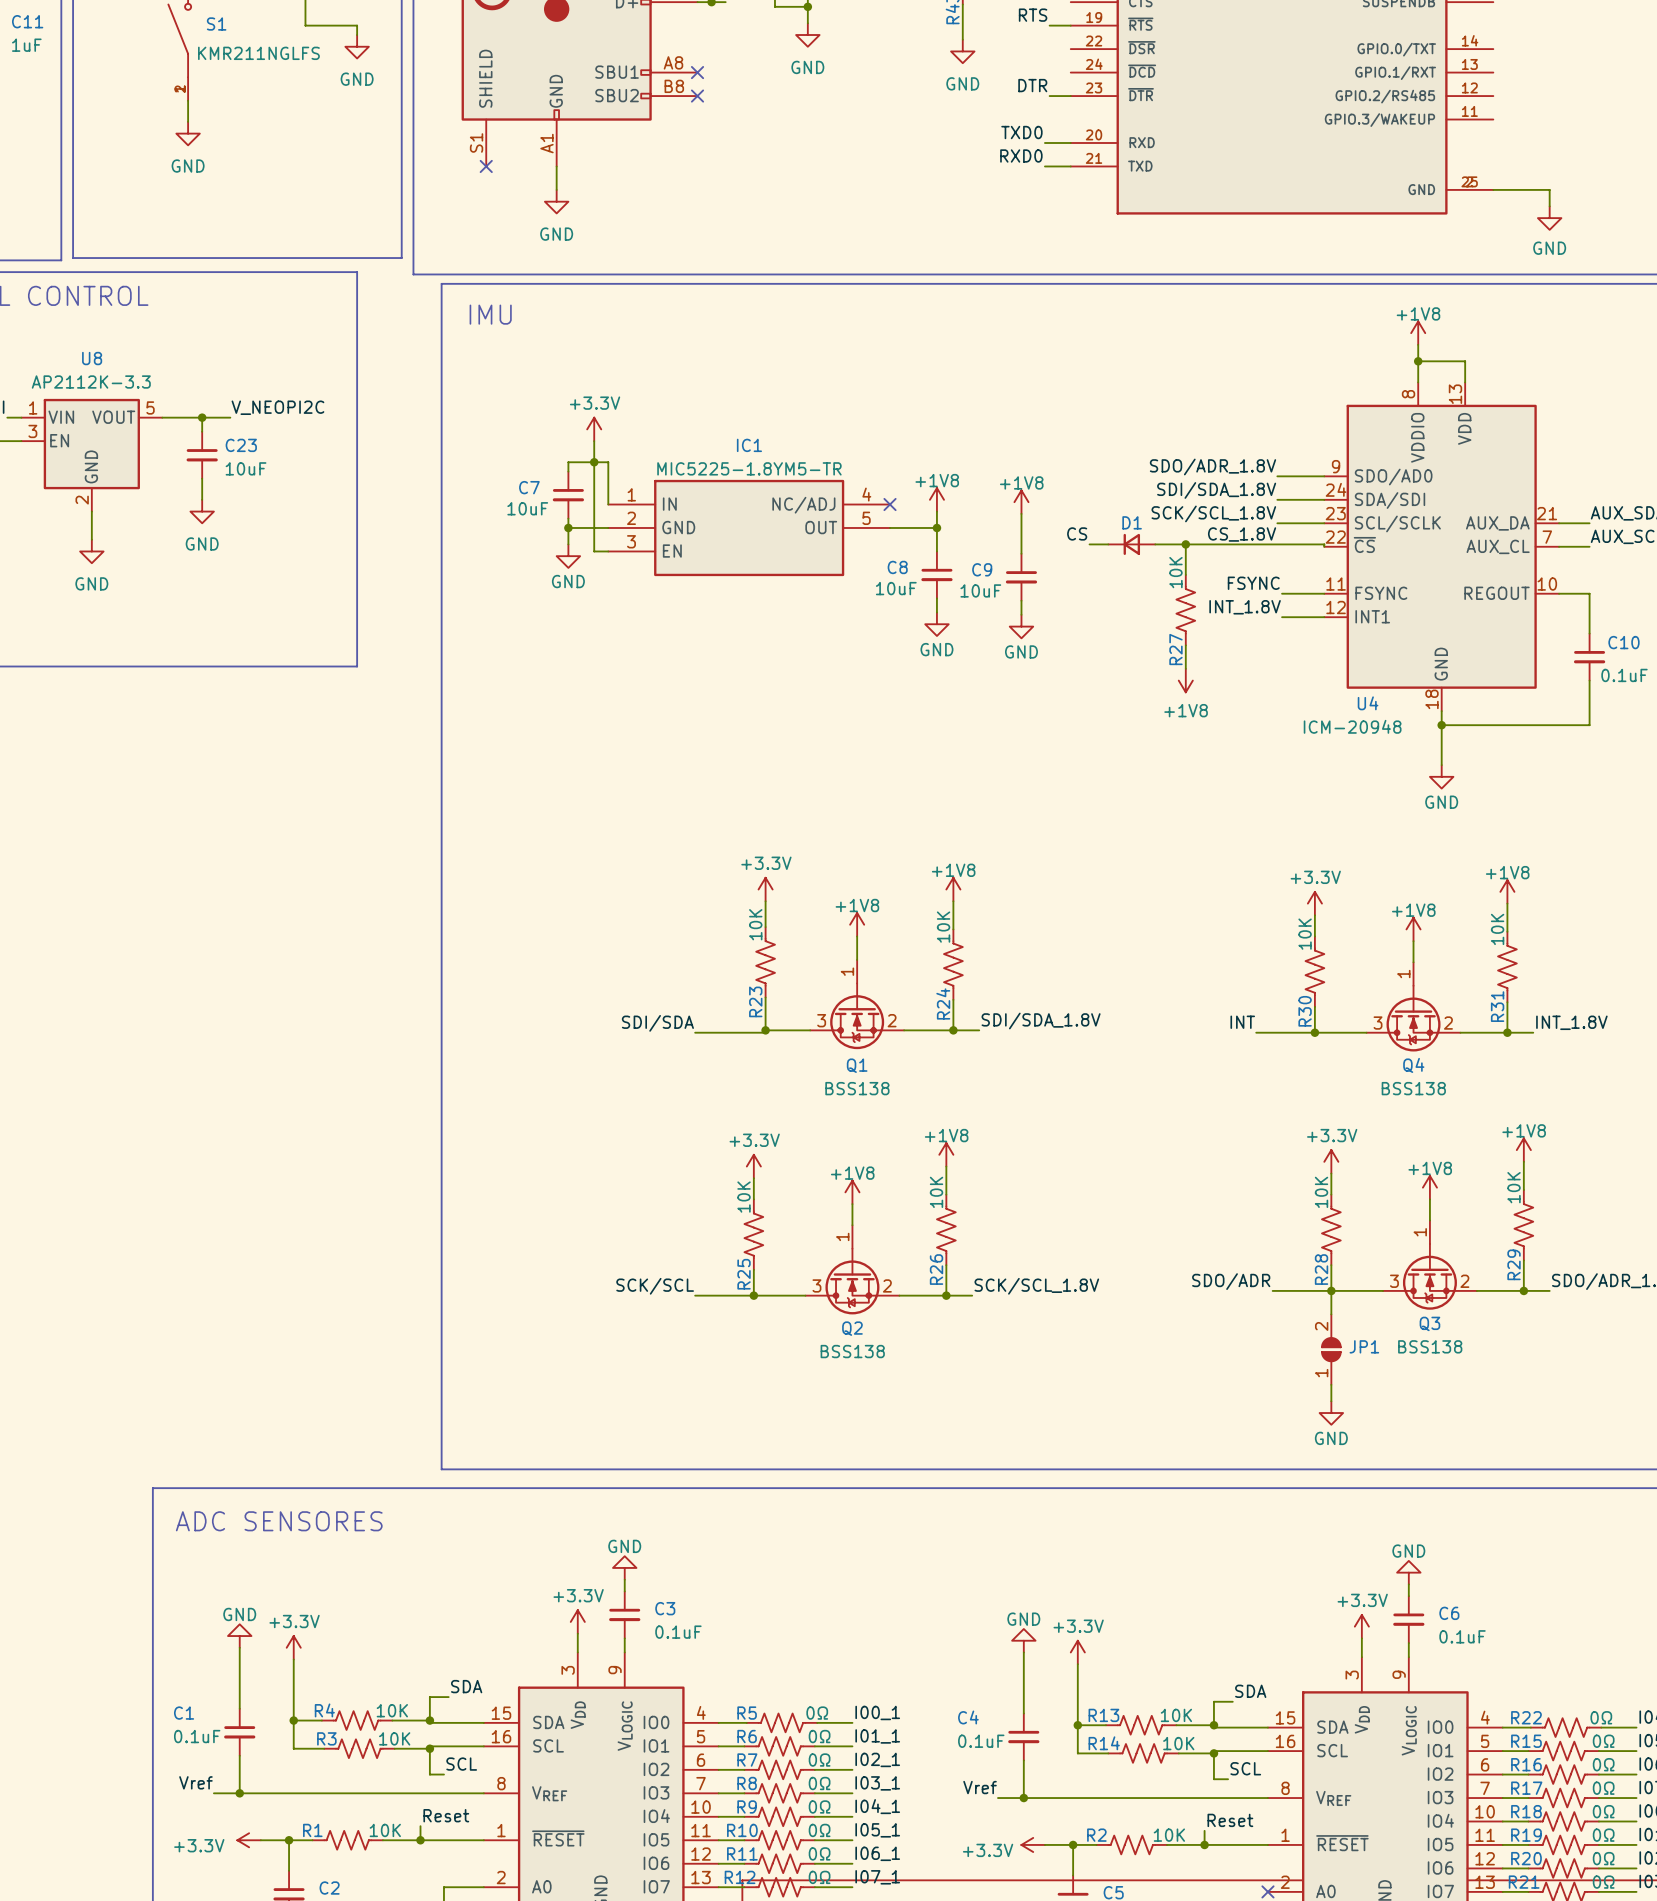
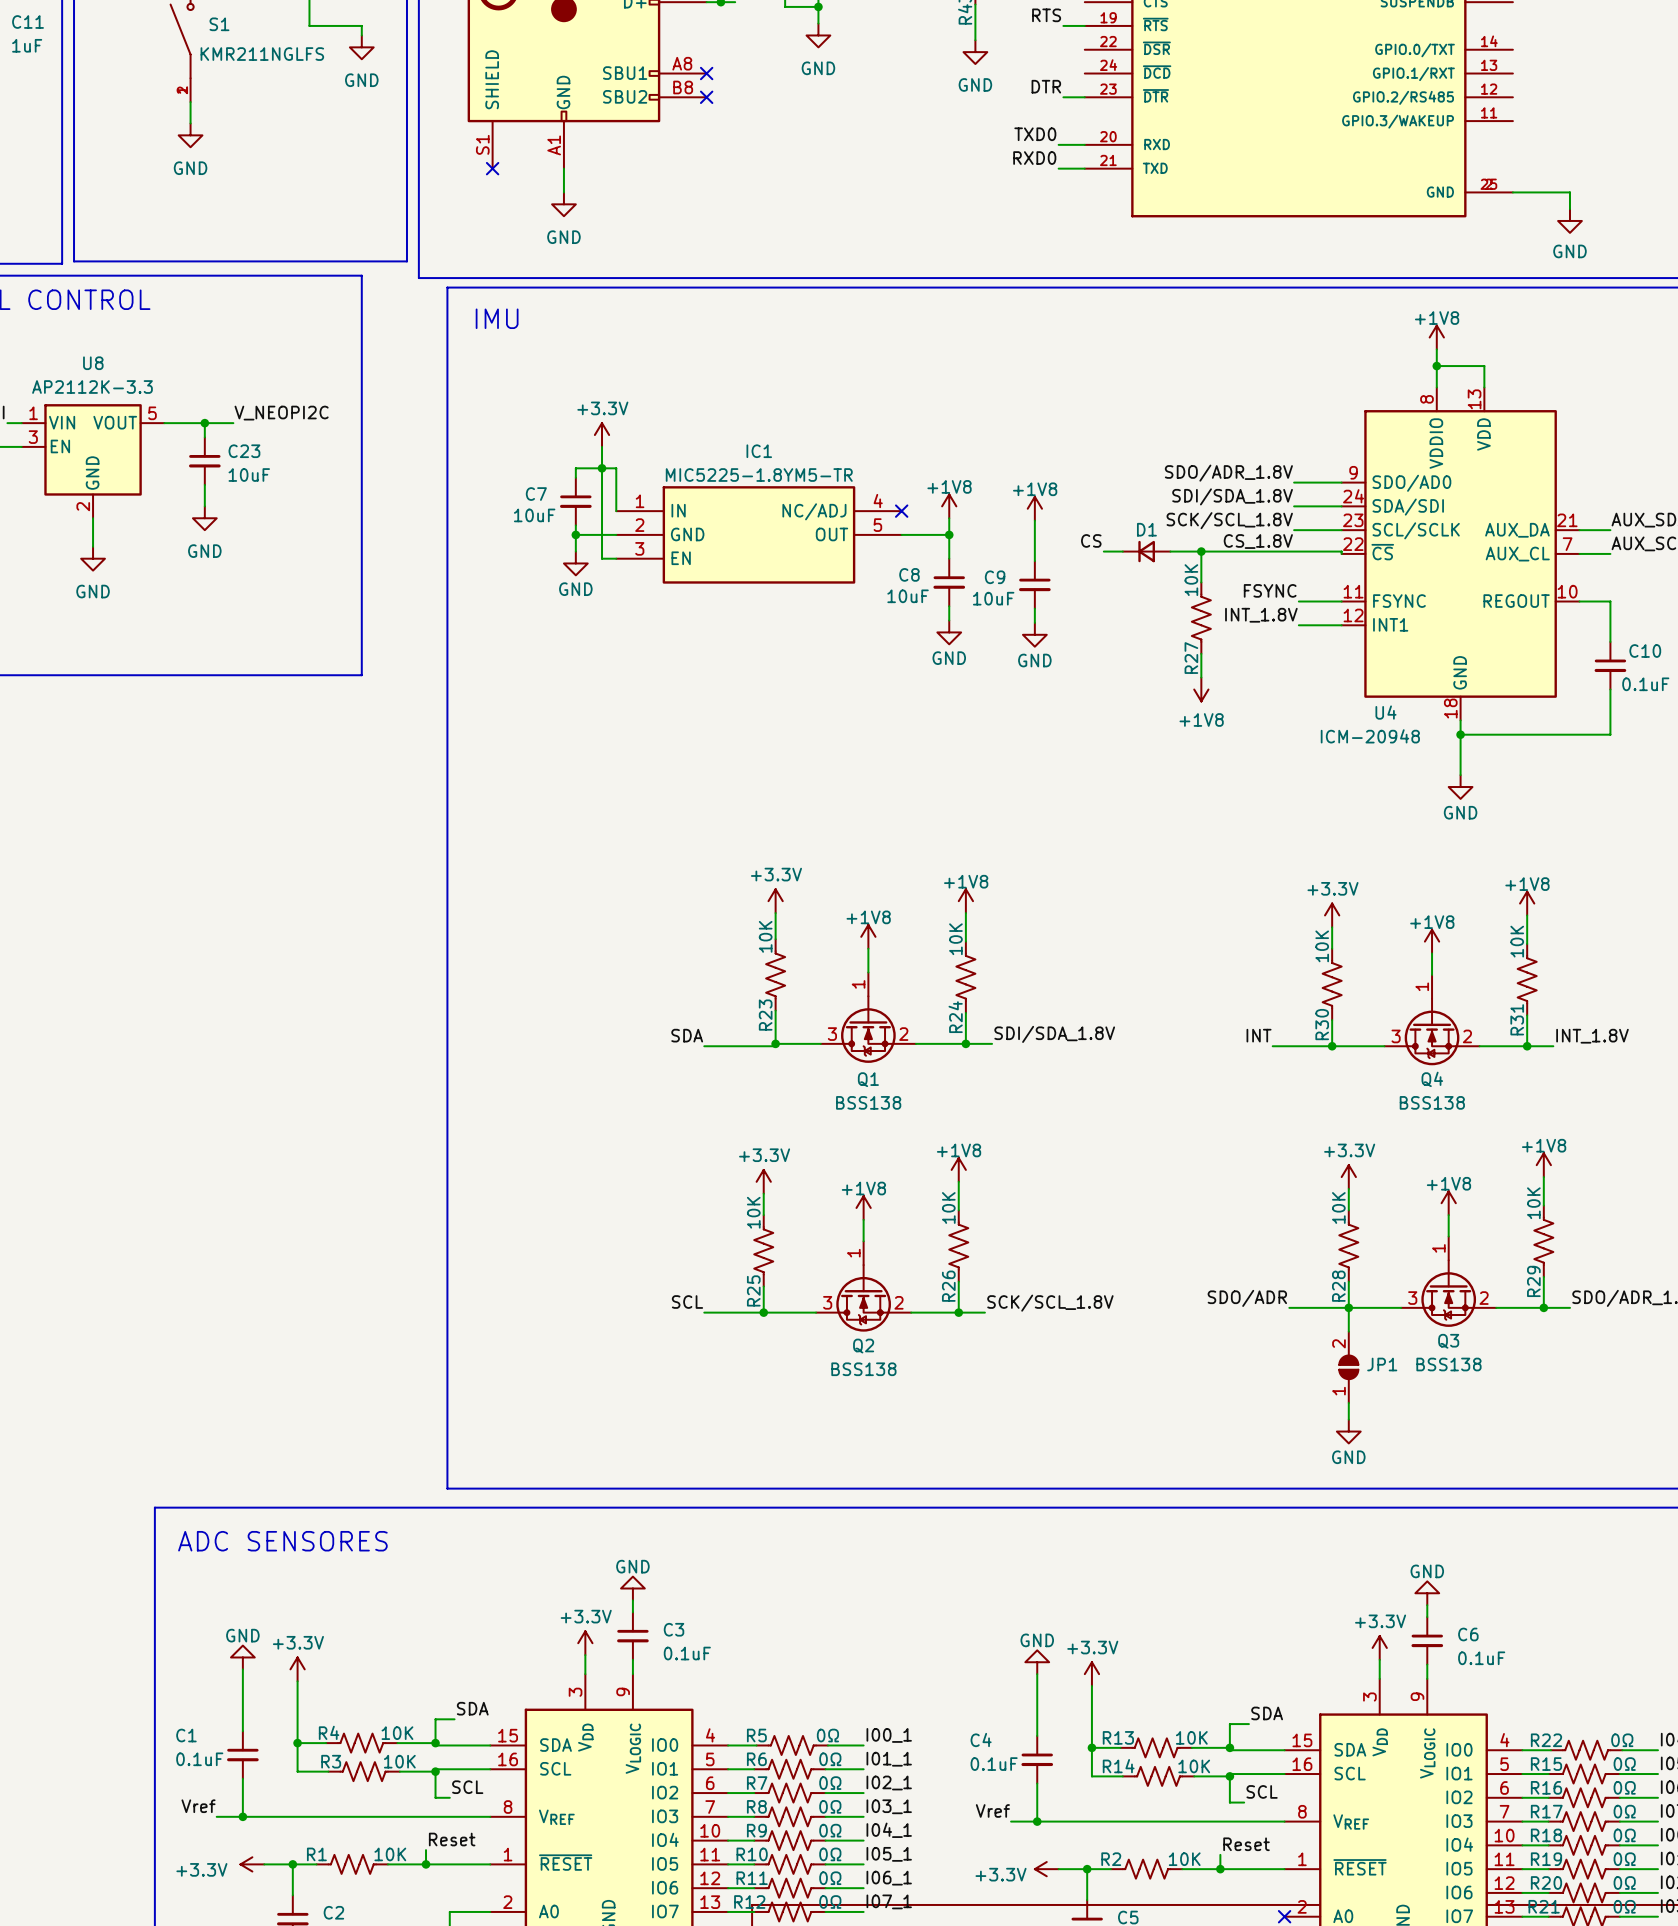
label: SDI/SDA (657, 1023) -> SDA (687, 1035)
label: SCK/SCL (655, 1286) -> SCL (687, 1302)

